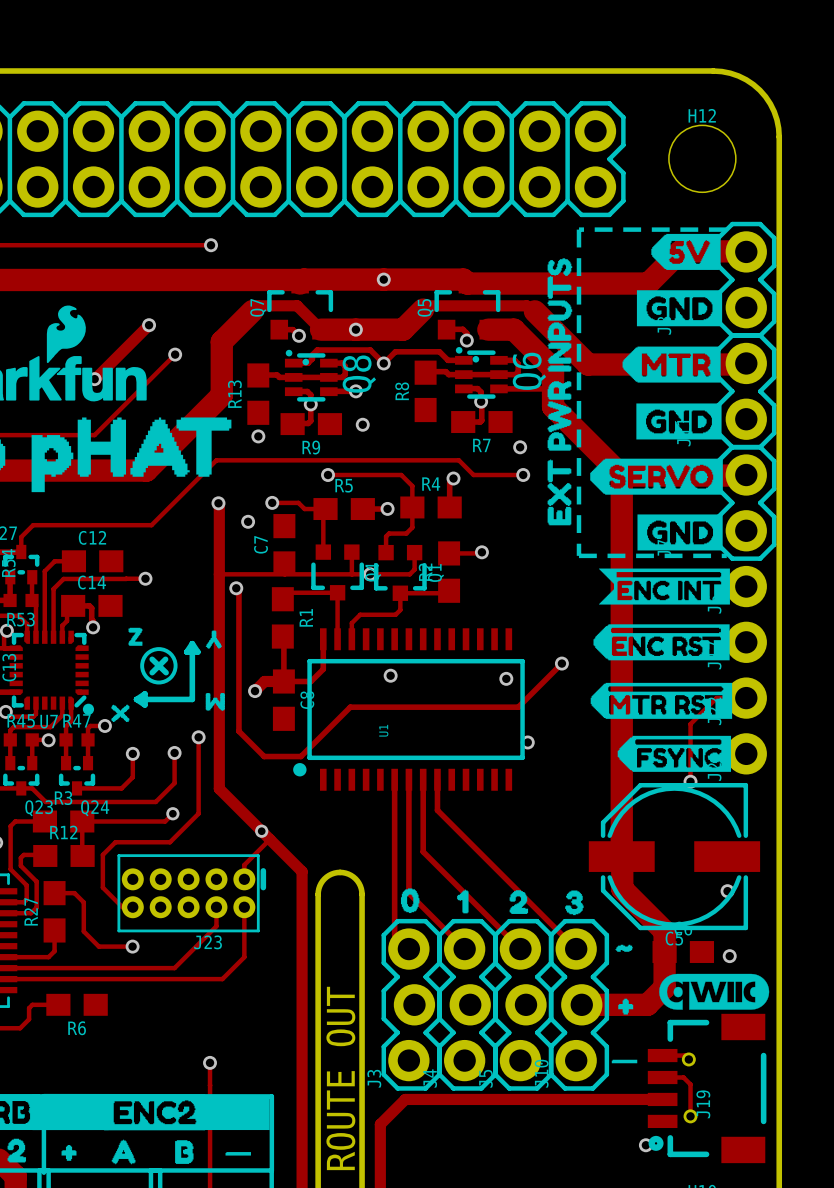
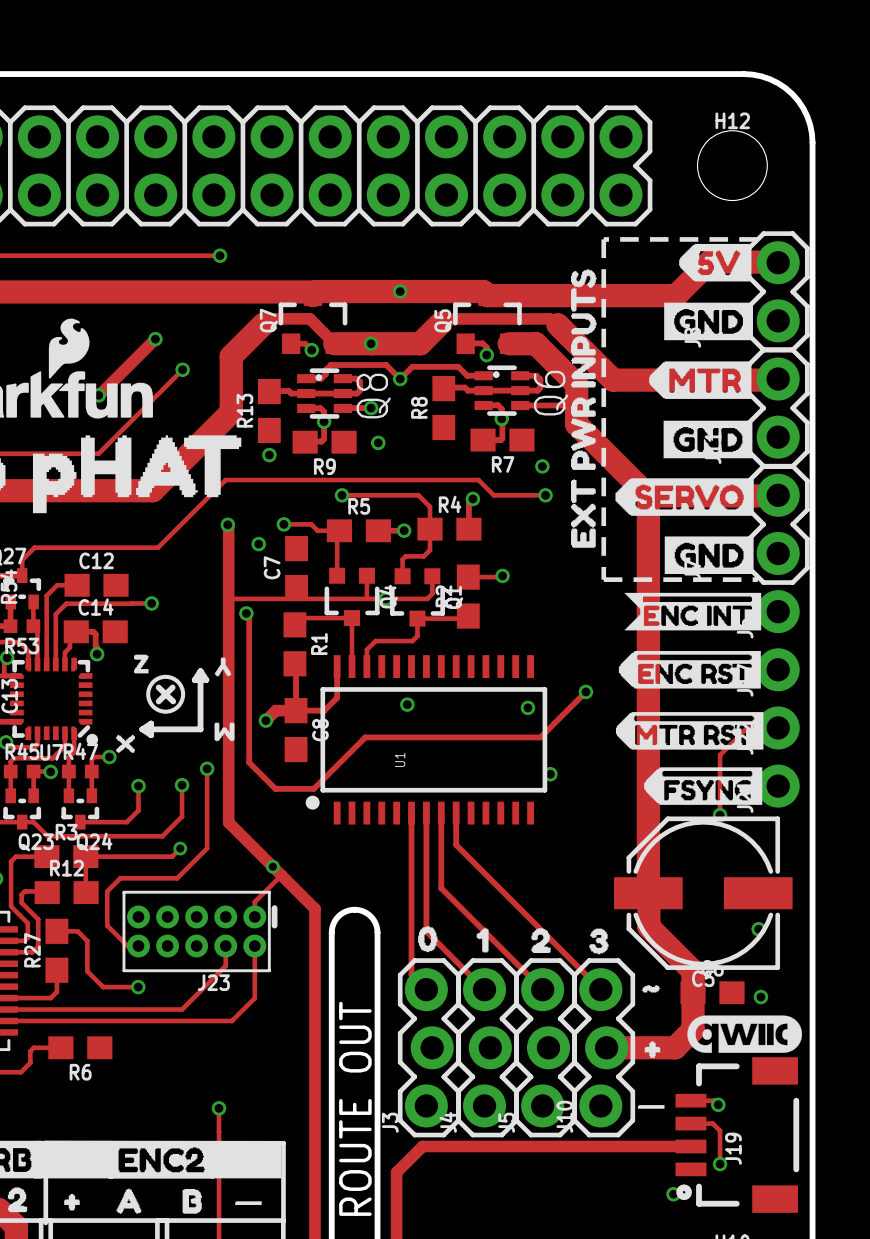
Q6 footprint: [455, 347, 508, 399] -> [474, 365, 530, 416]
Q8 footprint: [284, 349, 338, 402] -> [297, 368, 353, 419]

